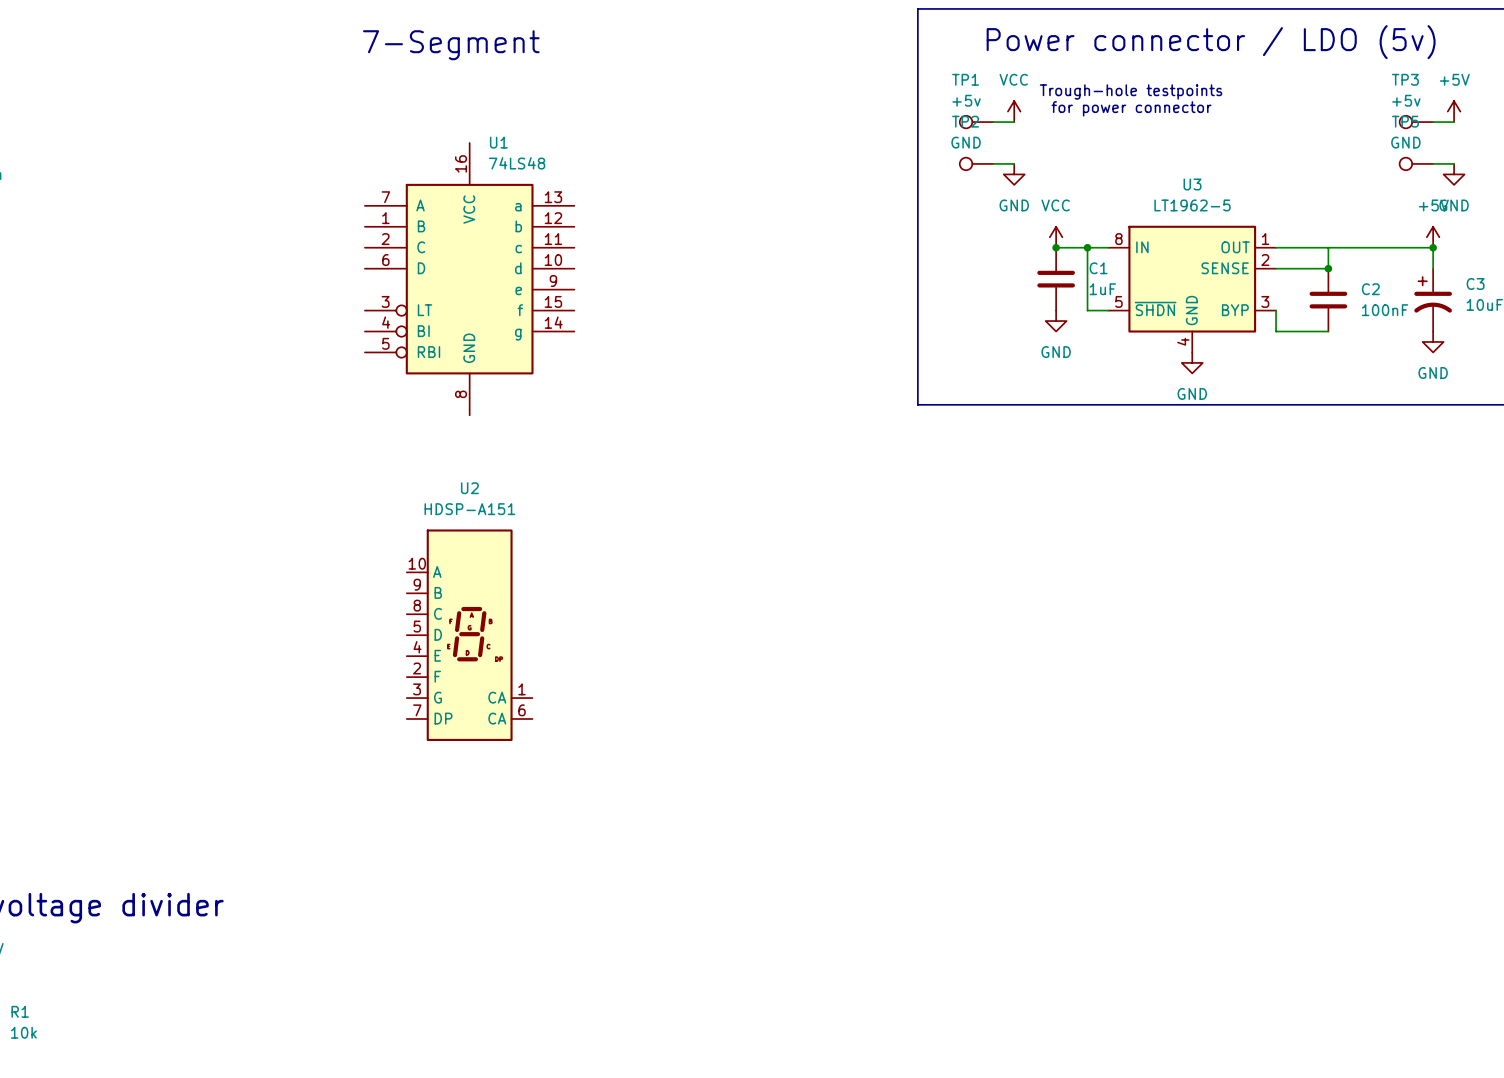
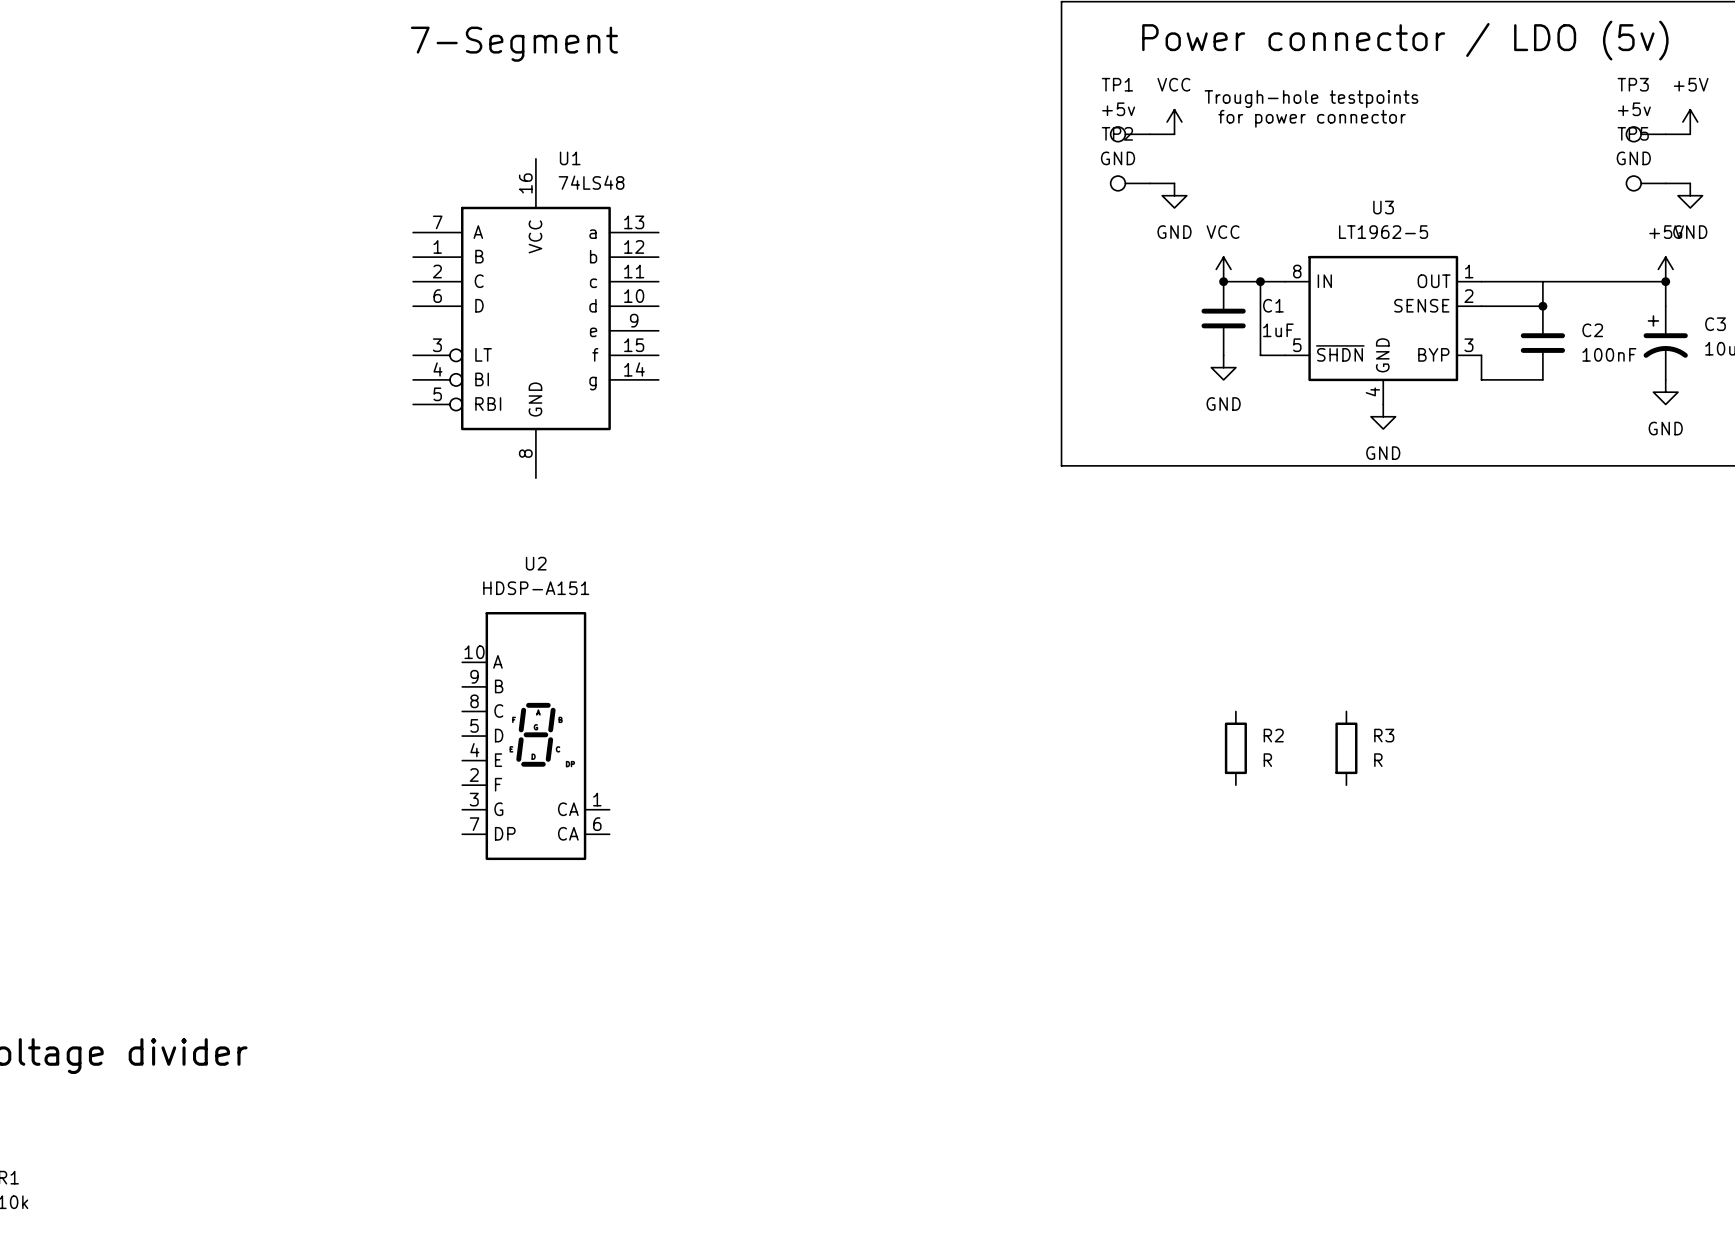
R2: none -> R (1235, 748)
R3: none -> R (1346, 748)

